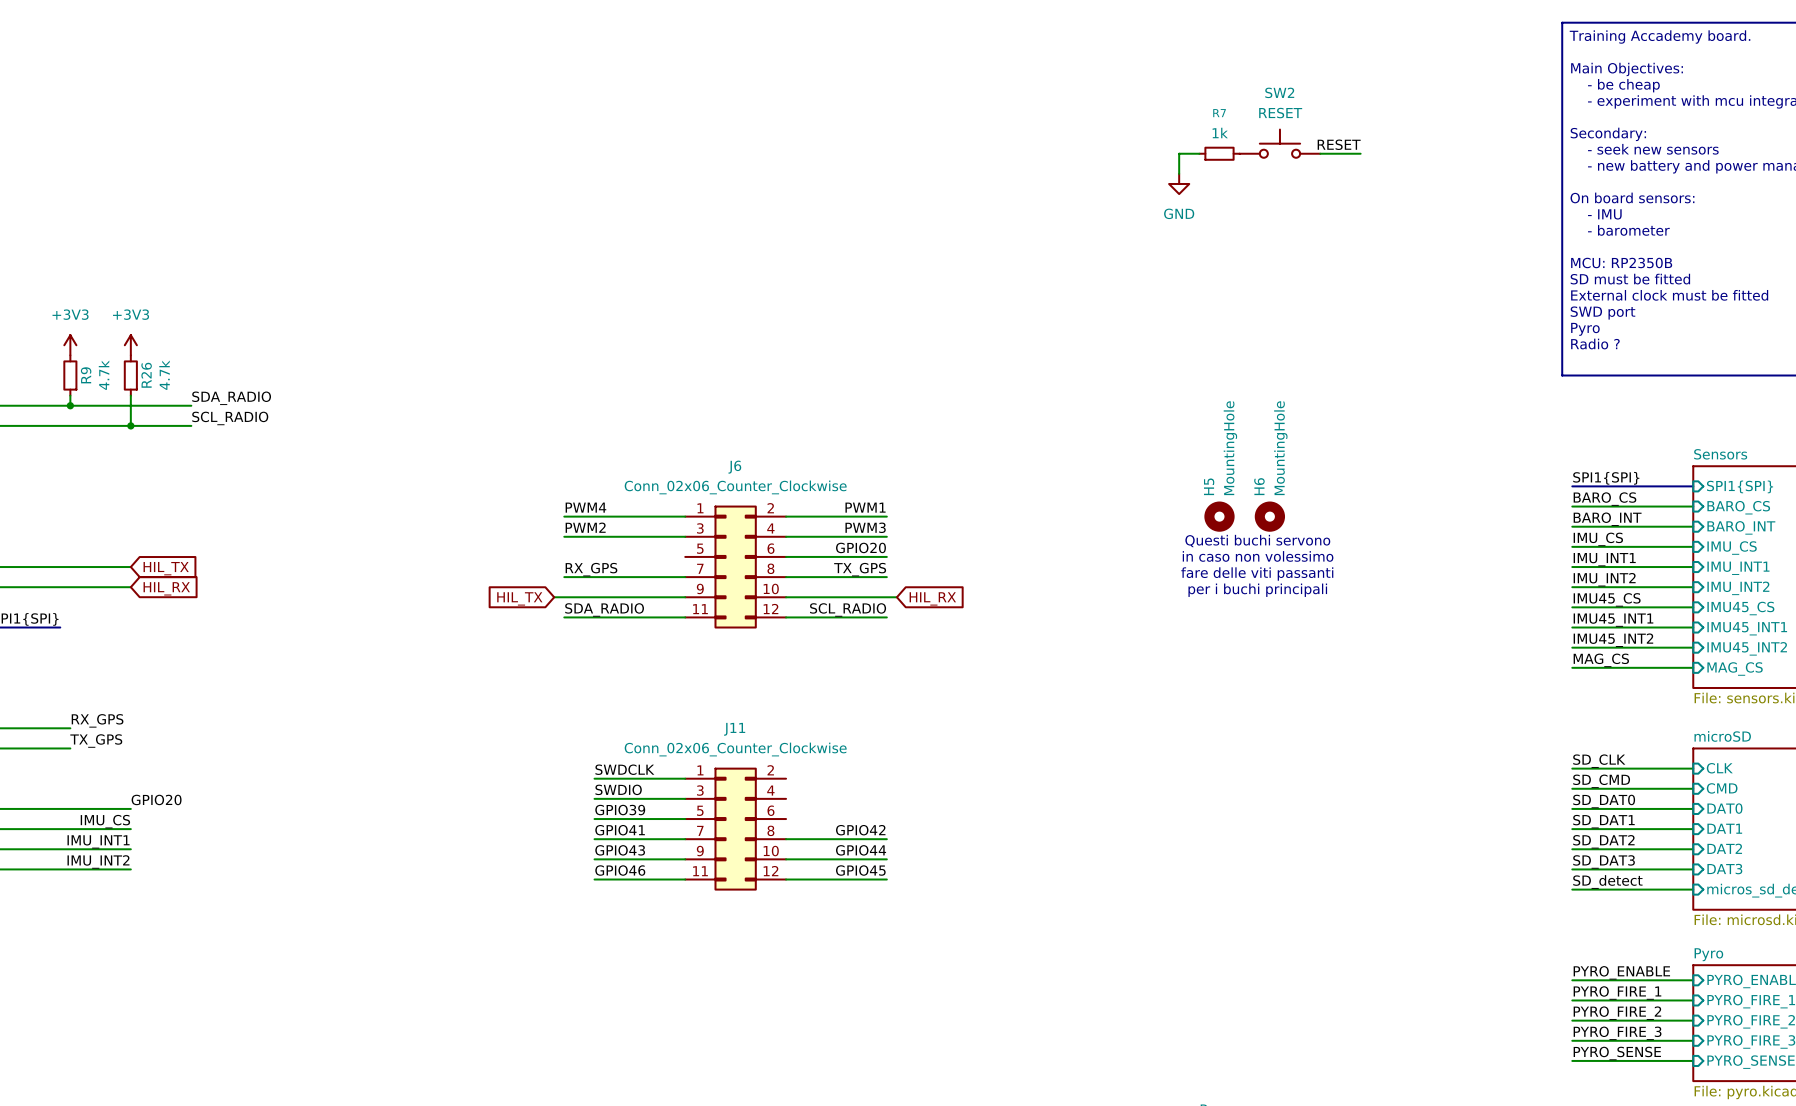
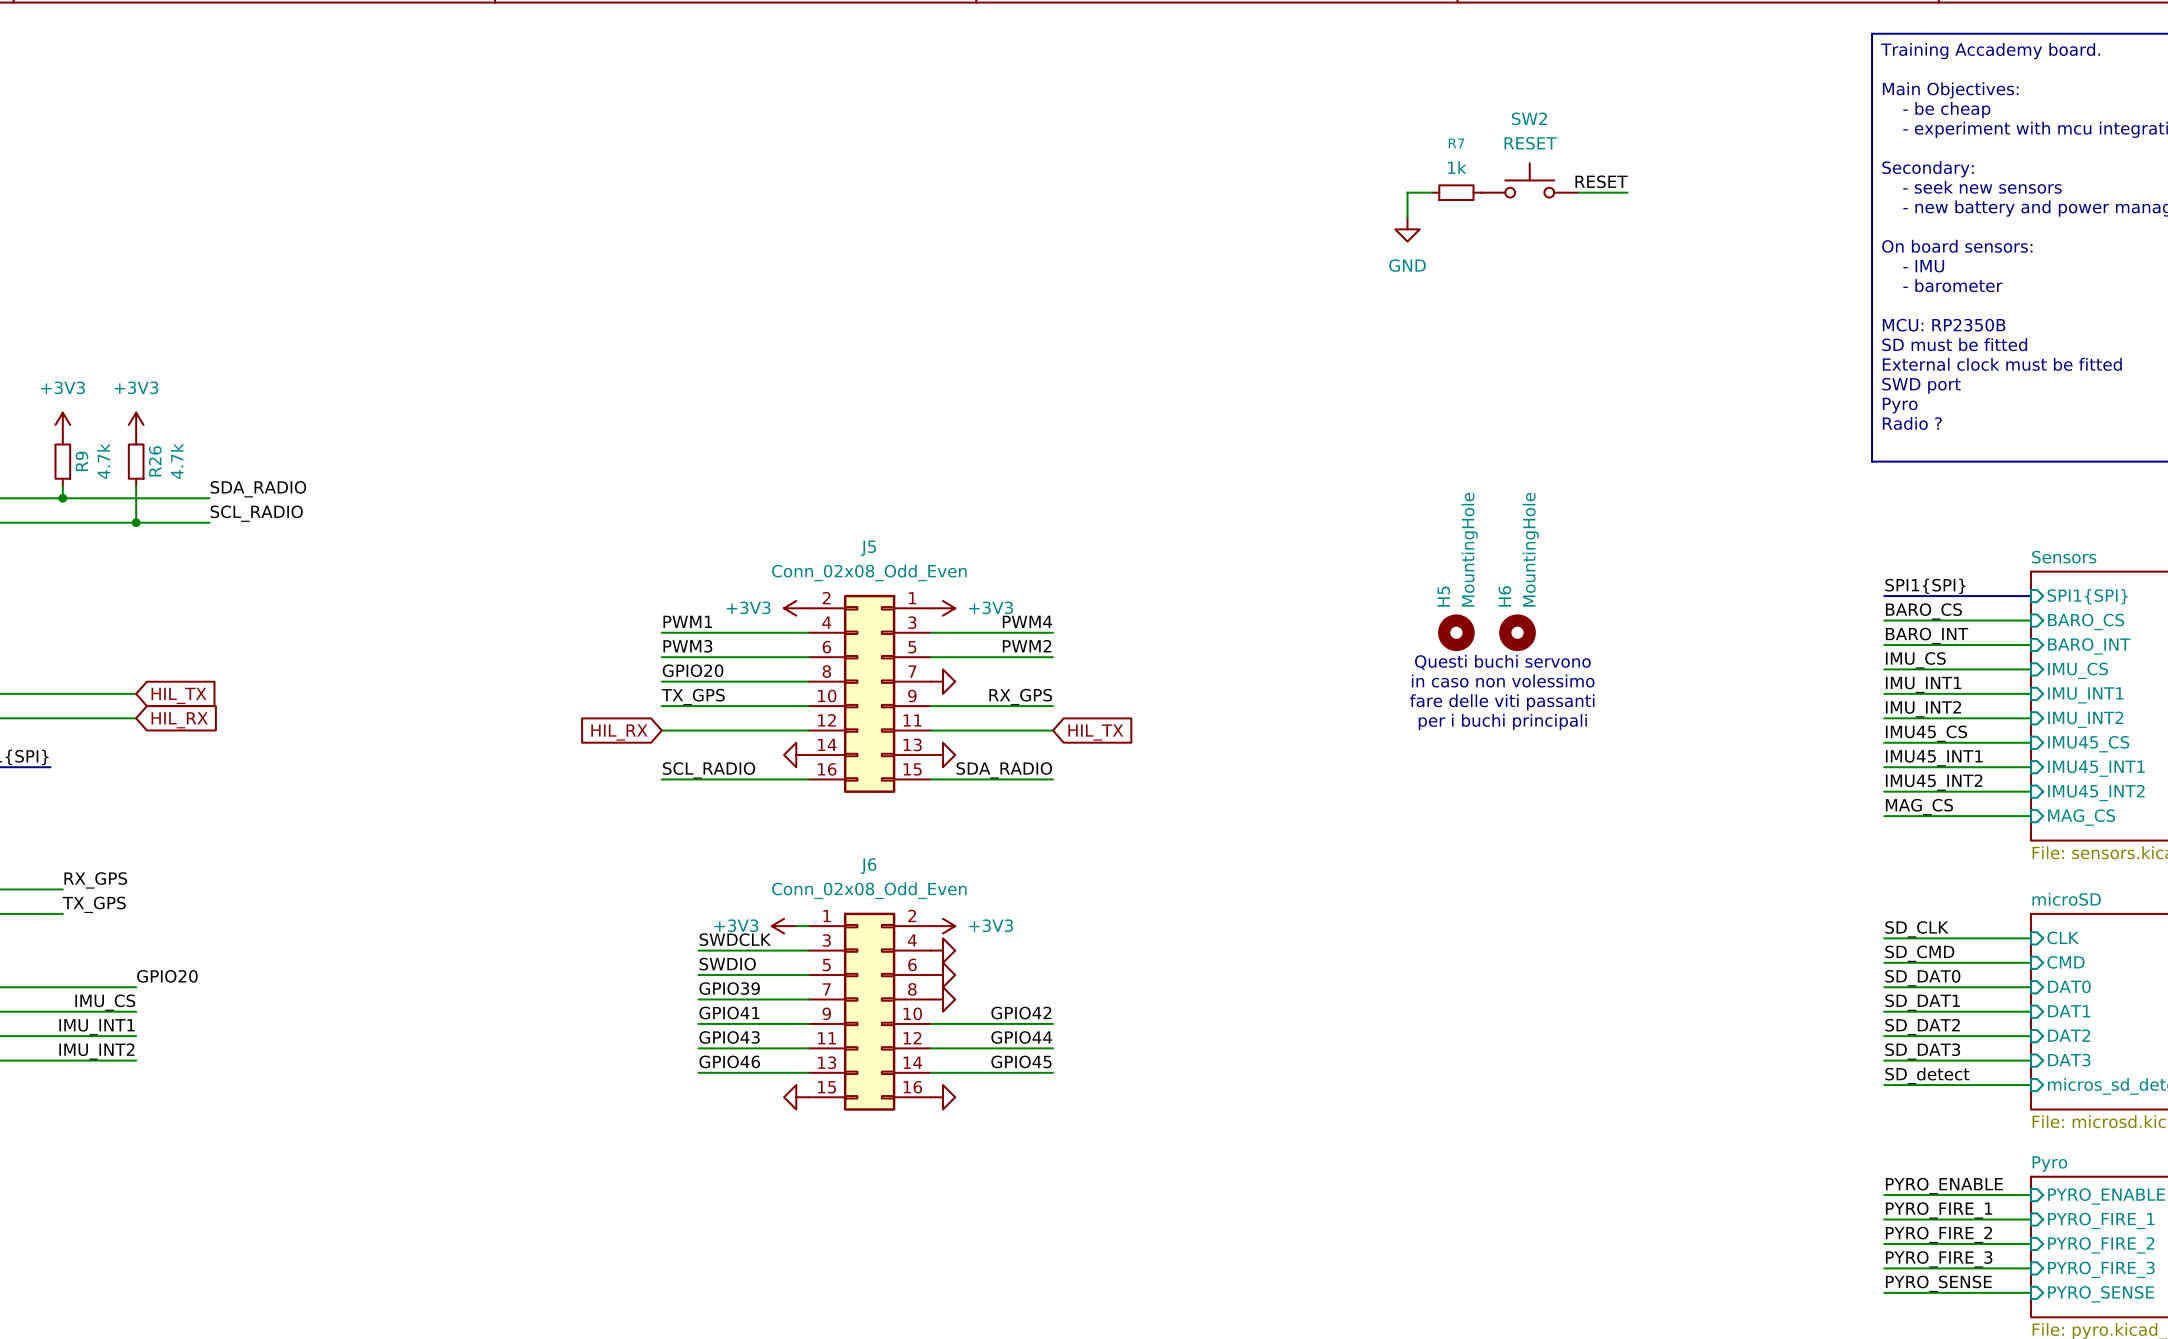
J6 name position: J6 (734, 467) -> J6 (868, 866)
J6 value: Conn_02x06_Counter_Clockwise (735, 487) -> Conn_02x08_Odd_Even (869, 890)
power symbol: none -> +3V3 (796, 608)
power symbol: none -> +3V3 (942, 608)
J6 symbol: [685, 505, 787, 629] -> [808, 912, 931, 1111]
label: PWM4 (585, 507) -> PWM1 (687, 621)
label: PWM1 (865, 507) -> PWM4 (1027, 621)
label: PWM2 (585, 527) -> PWM3 (687, 646)
label: PWM3 (865, 527) -> PWM2 (1027, 646)
label: none -> GPIO20 (693, 670)
label: GPIO20 (860, 547) -> none
wire: none -> (661, 681) (808, 681)
wire: (786, 556) (886, 556) -> none
power symbol: none -> (942, 681)
J5: none -> Conn_02x08_Odd_Even (869, 693)
label: RX_GPS (591, 569) -> TX_GPS (693, 697)
label: TX_GPS (860, 569) -> RX_GPS (1020, 697)
wire: (554, 597) (564, 597) -> none
wire: (886, 597) (896, 597) -> none
global label: HIL_TX (519, 598) -> HIL_RX (619, 732)
global label: HIL_RX (932, 598) -> HIL_TX (1095, 732)
label: SDA_RADIO (604, 609) -> SCL_RADIO (709, 770)
label: SCL_RADIO (848, 609) -> SDA_RADIO (1004, 770)
wire: (564, 617) (685, 617) -> (661, 779) (808, 779)
power symbol: none -> (796, 754)
wire: (786, 617) (886, 617) -> (930, 779) (1053, 779)
power symbol: none -> (942, 754)
power symbol: none -> +3V3 (784, 926)
wire: none -> (796, 926) (808, 926)
power symbol: none -> +3V3 (942, 926)
power symbol: none -> (942, 950)
power symbol: none -> (942, 975)
power symbol: none -> (942, 999)
J11: Conn_02x06_Counter_Clockwise (735, 829) -> none
power symbol: none -> (796, 1097)
power symbol: none -> (942, 1097)

